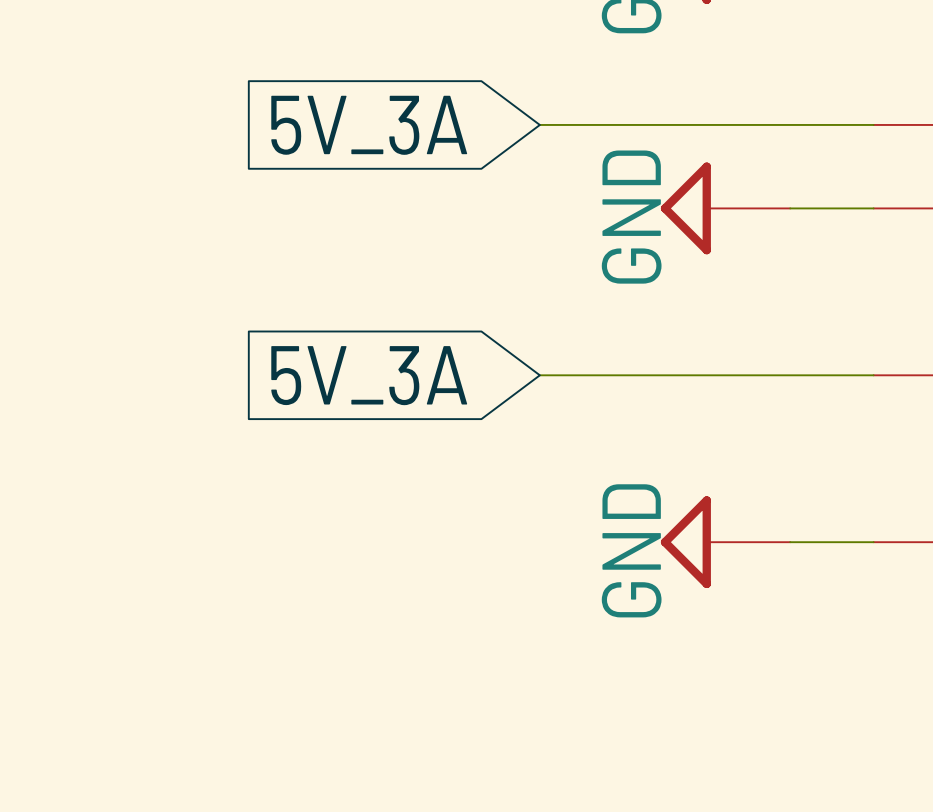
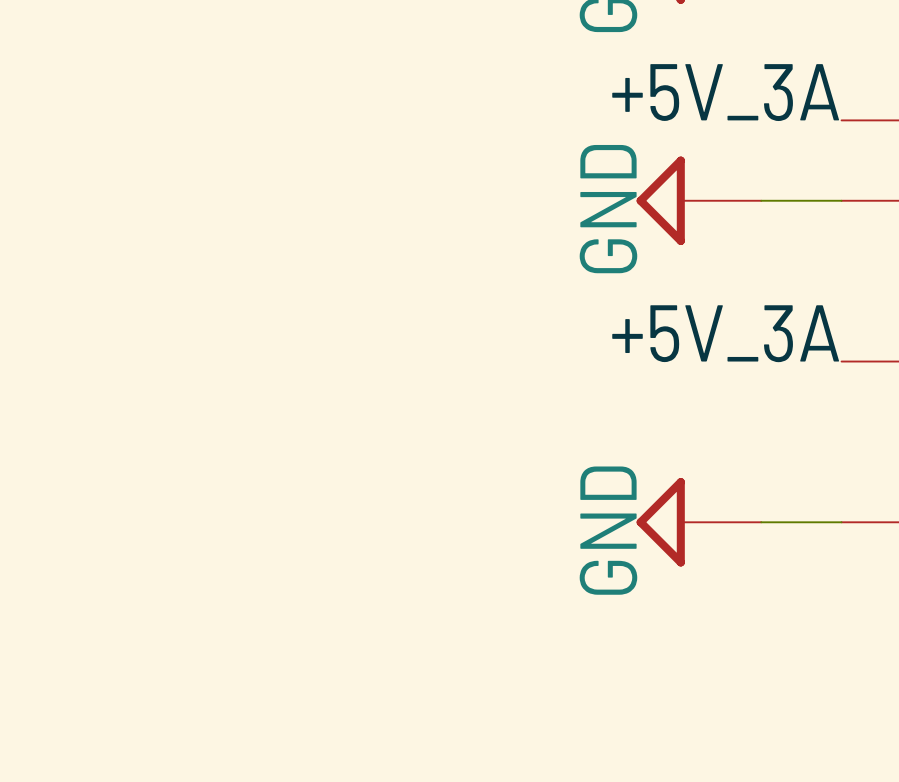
label: none -> +5V_3A (725, 92)
wire: (539, 124) (873, 124) -> none
global label: 5V_3A (369, 125) -> none
label: none -> +5V_3A (725, 333)
global label: 5V_3A (369, 375) -> none
wire: (539, 375) (873, 375) -> none

